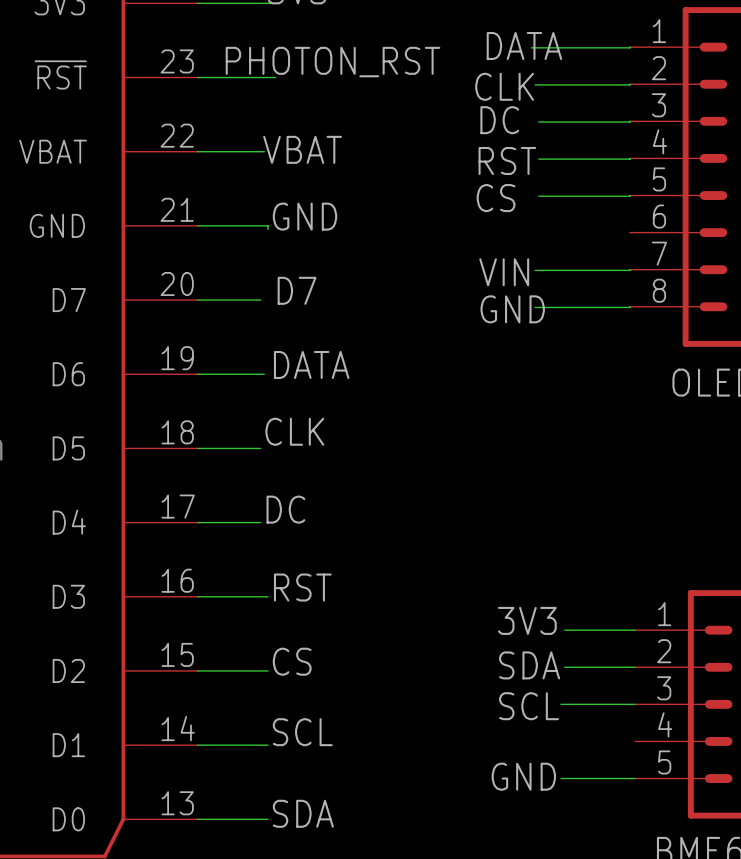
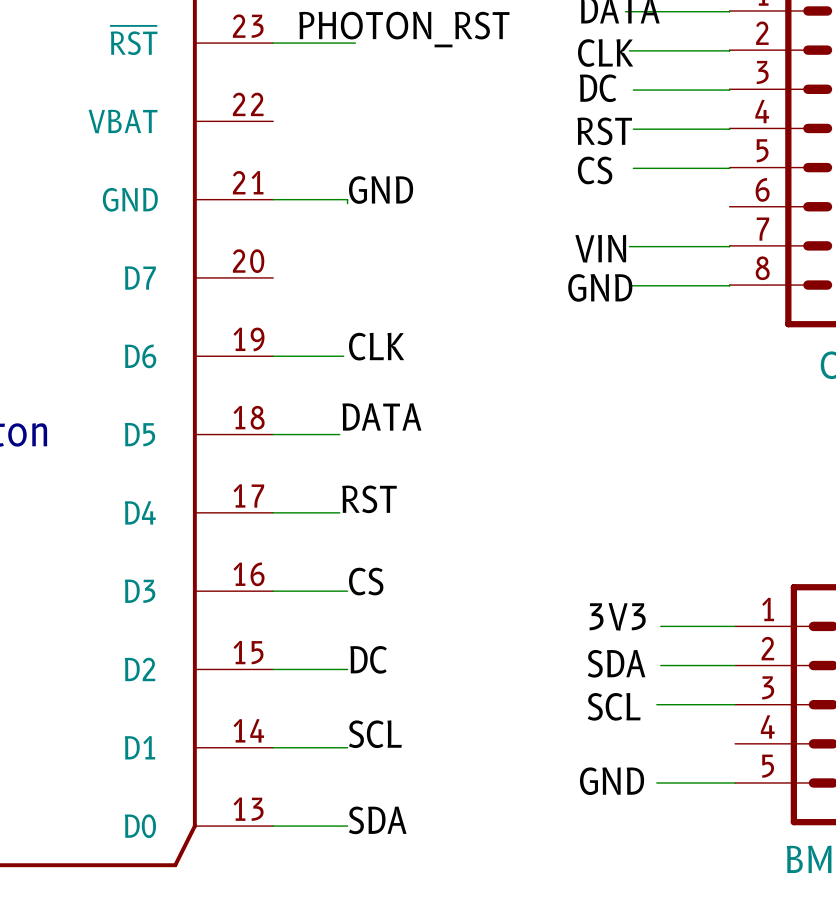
label: VBAT (302, 149) -> none
wire: (197, 151) (264, 151) -> none
label: D7 (297, 290) -> none
wire: (197, 300) (260, 300) -> none
label: DATA (311, 364) -> CLK (376, 346)
label: CLK (294, 431) -> DATA (381, 416)
label: DC (285, 509) -> RST (369, 499)
label: RST (302, 587) -> CS (366, 581)
label: CS (292, 661) -> DC (368, 659)

